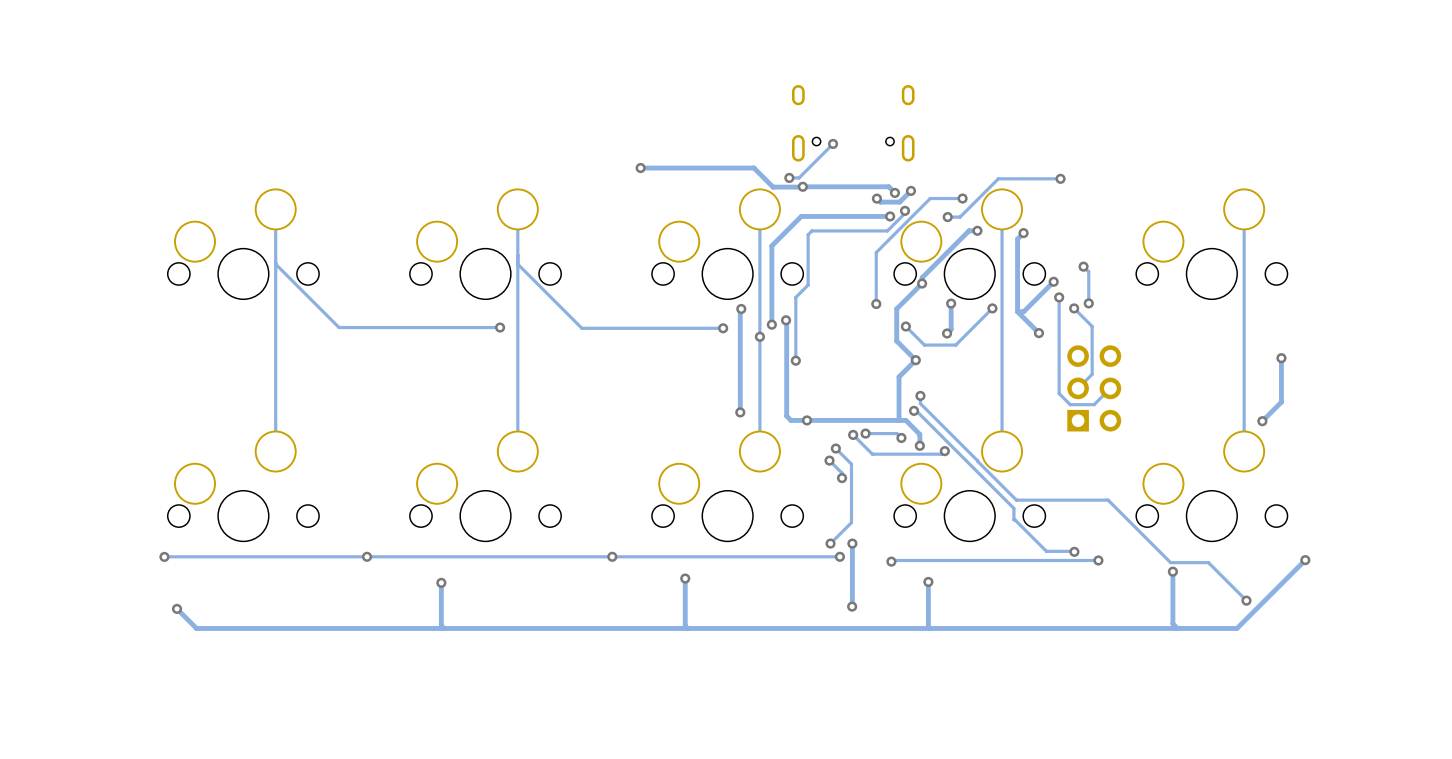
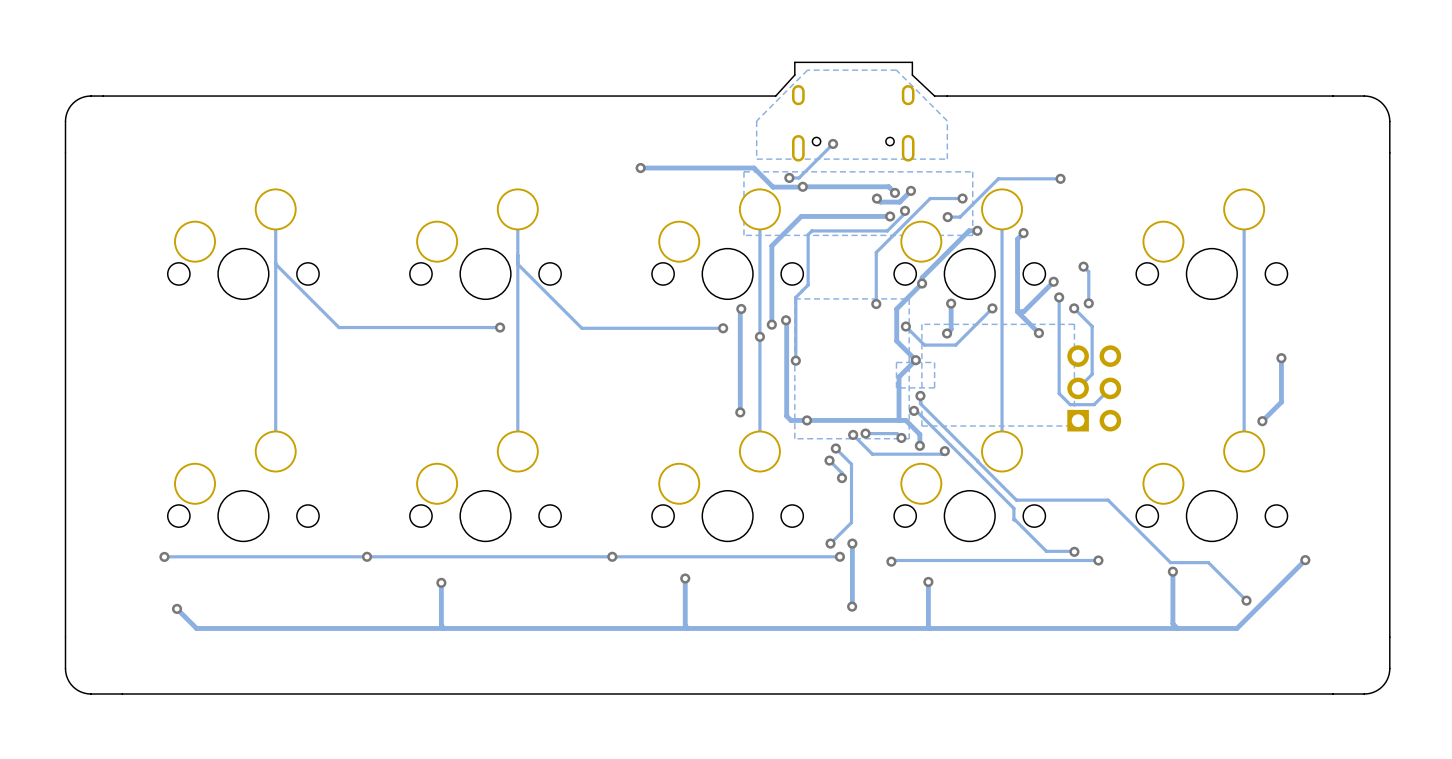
board edge: none -> (912, 62) (912, 75) (934, 96) (1364, 96) (1375, 98) (1384, 105) (1389, 121) (1389, 668) (1387, 679) (1380, 688) (1364, 694) (90, 694) (79, 691) (71, 684) (65, 668) (65, 121) (68, 110) (75, 101) (90, 96) (775, 96) (794, 75) (794, 62) (912, 62)
zone outline: none -> (896, 70) (947, 121) (947, 159) (756, 159) (756, 121) (807, 70) (896, 70)
zone outline: none -> (972, 171) (972, 235) (743, 235) (743, 171) (972, 171)
zone outline: none -> (909, 298) (909, 438) (794, 438) (794, 298) (909, 298)
zone outline: none -> (1074, 324) (1074, 426) (921, 426) (921, 324) (1074, 324)
zone outline: none -> (934, 362) (934, 387) (896, 387) (896, 362) (934, 362)

